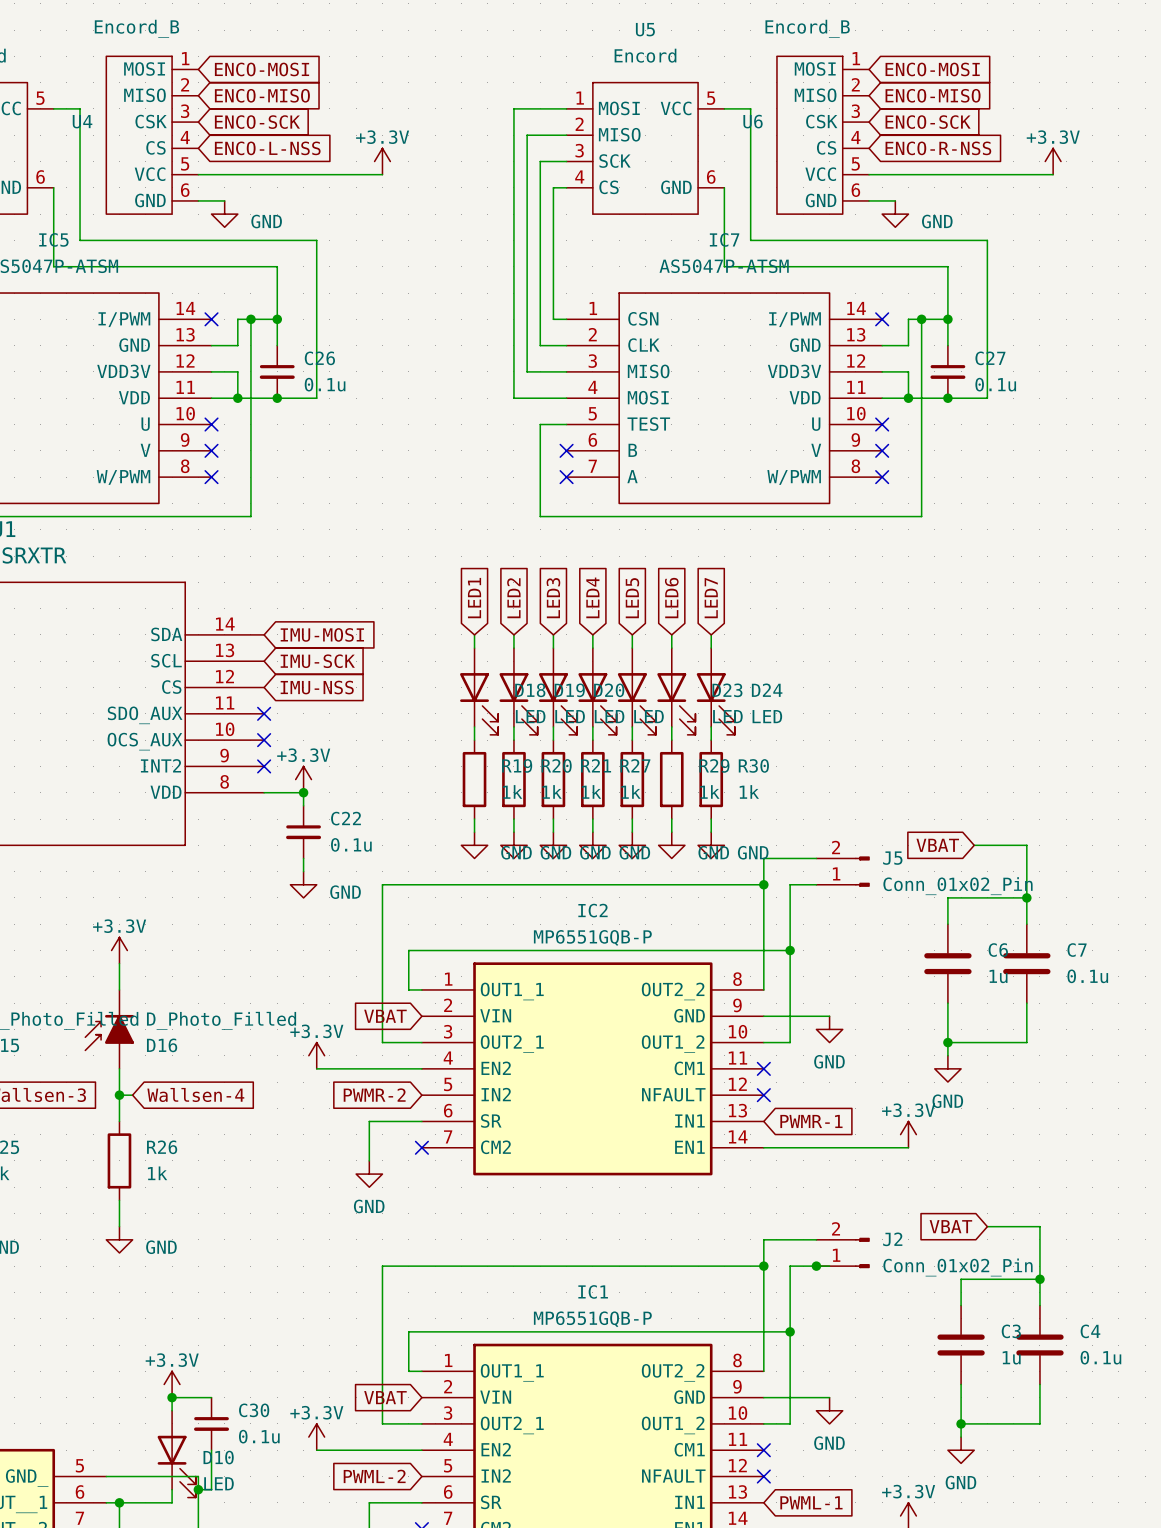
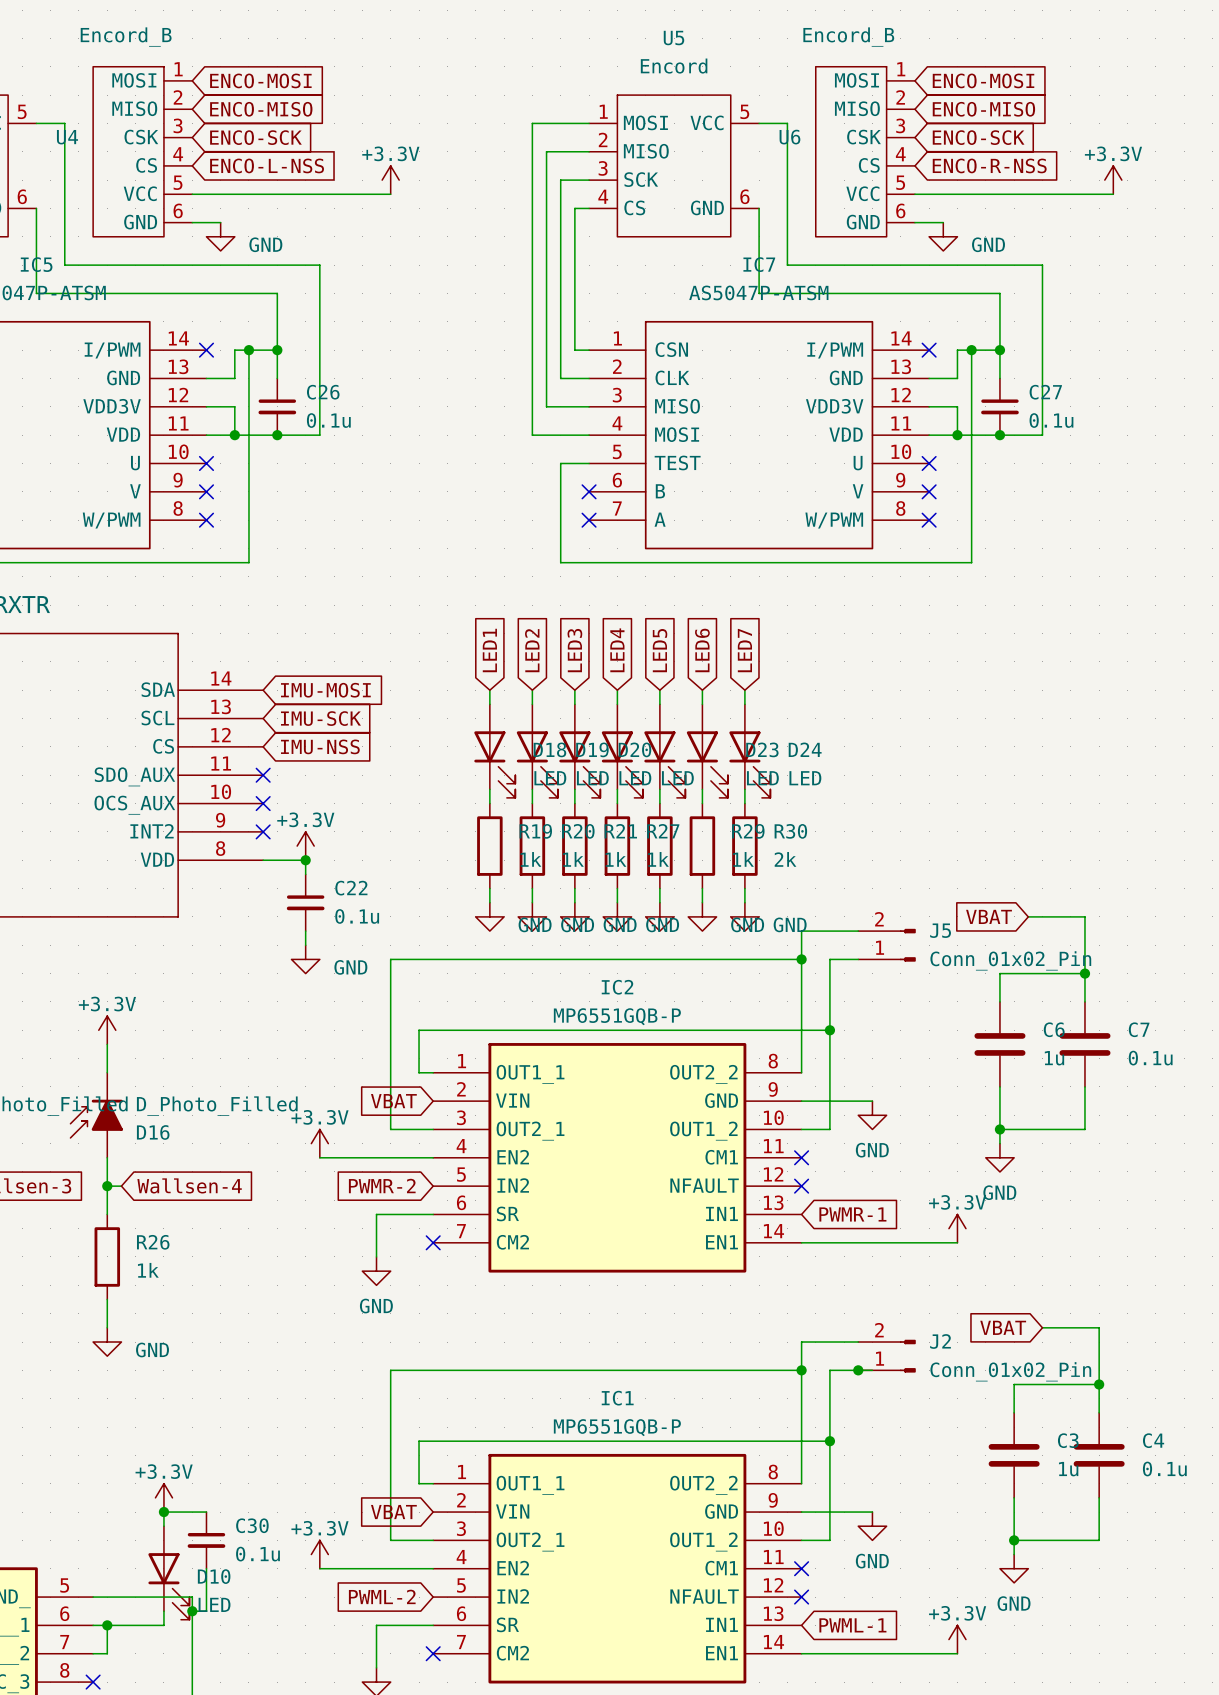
R30 value: 1k (749, 791) -> 2k (785, 859)

